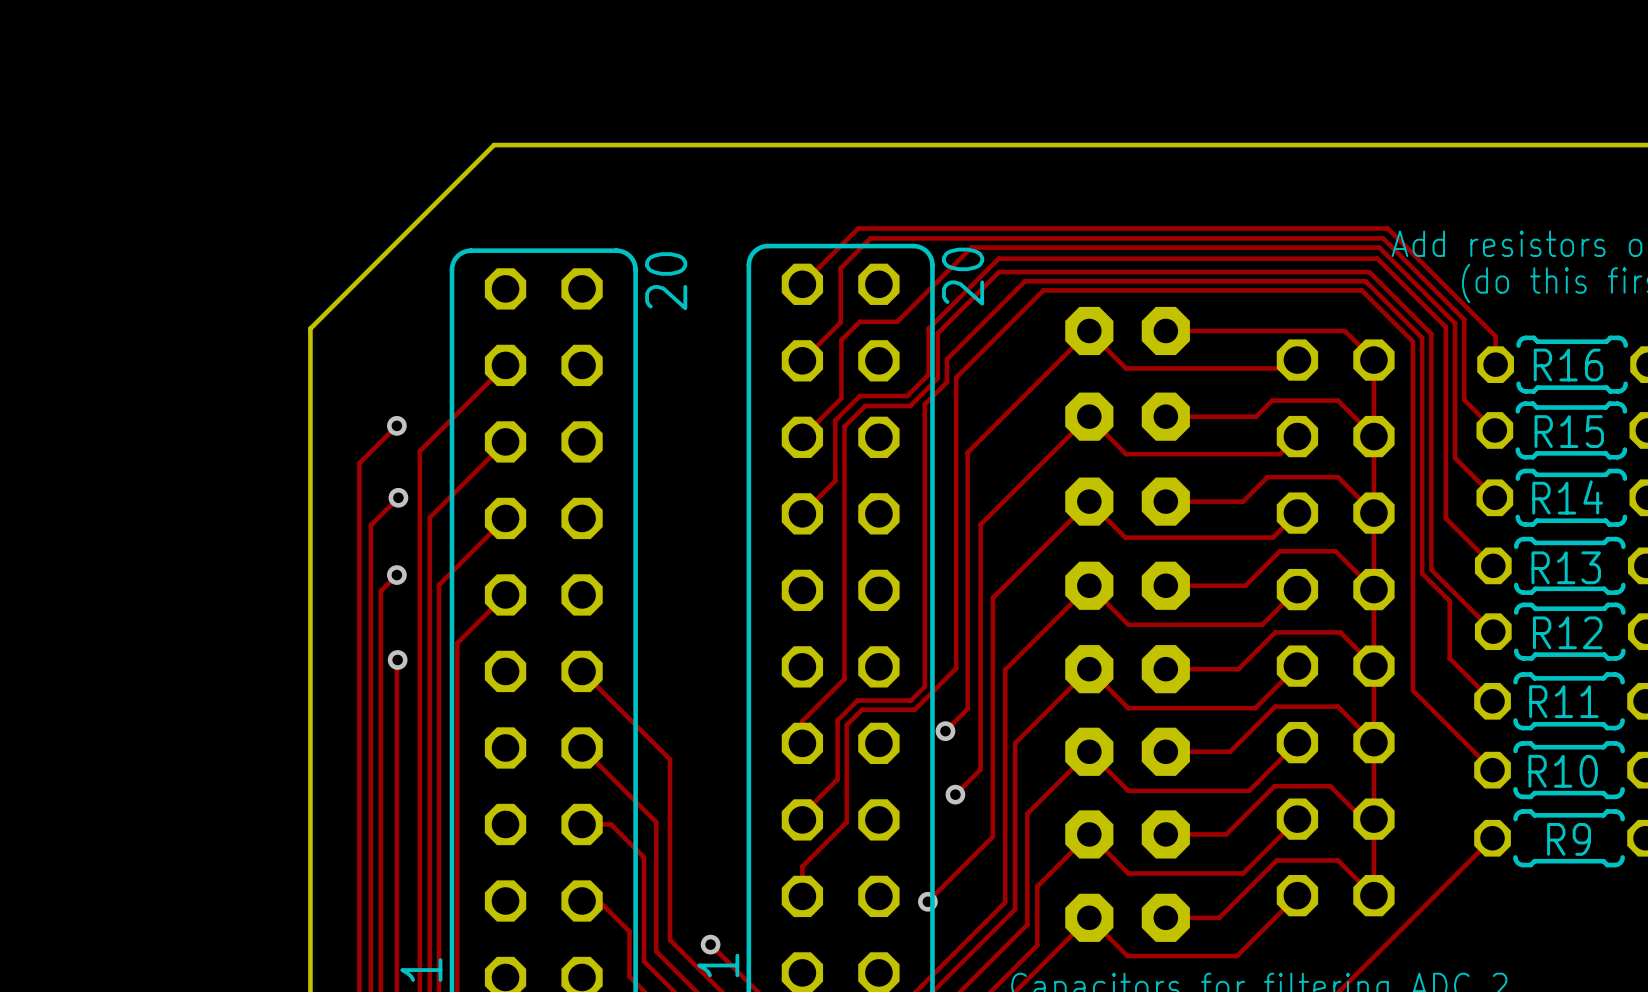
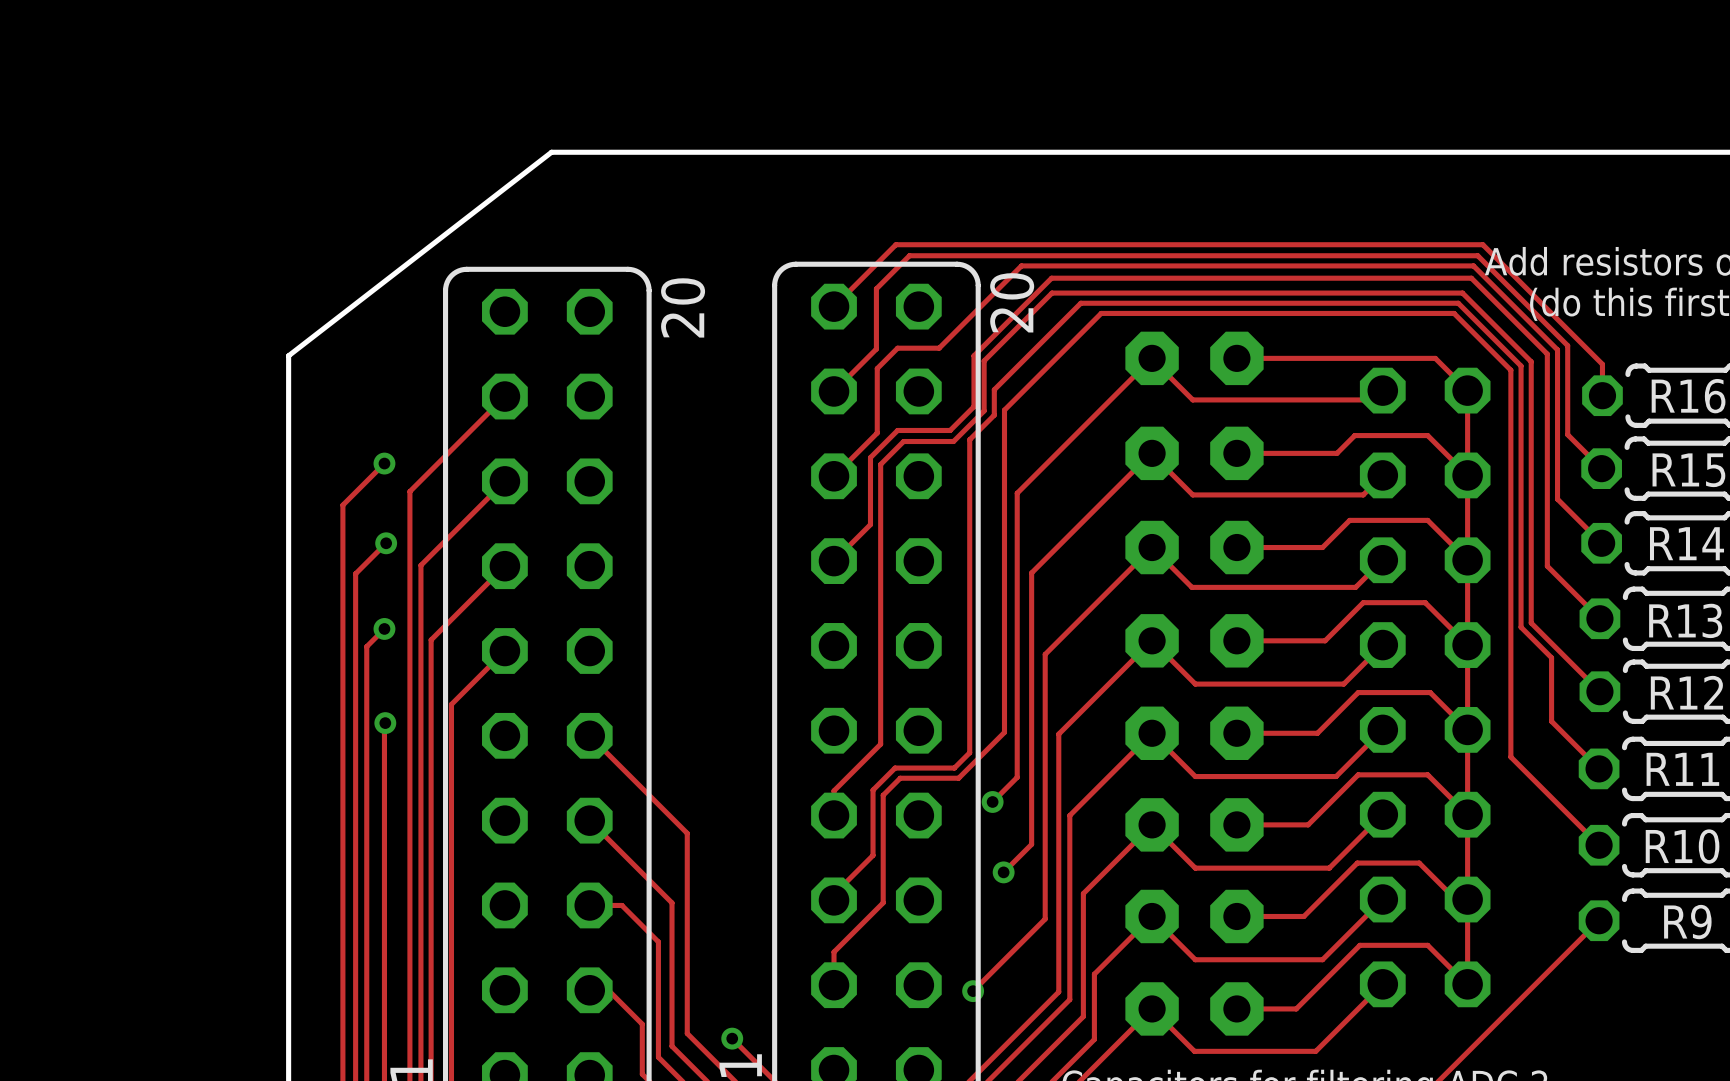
board edge: (547, 145) (494, 145) (310, 328) -> (551, 152) (288, 355)

